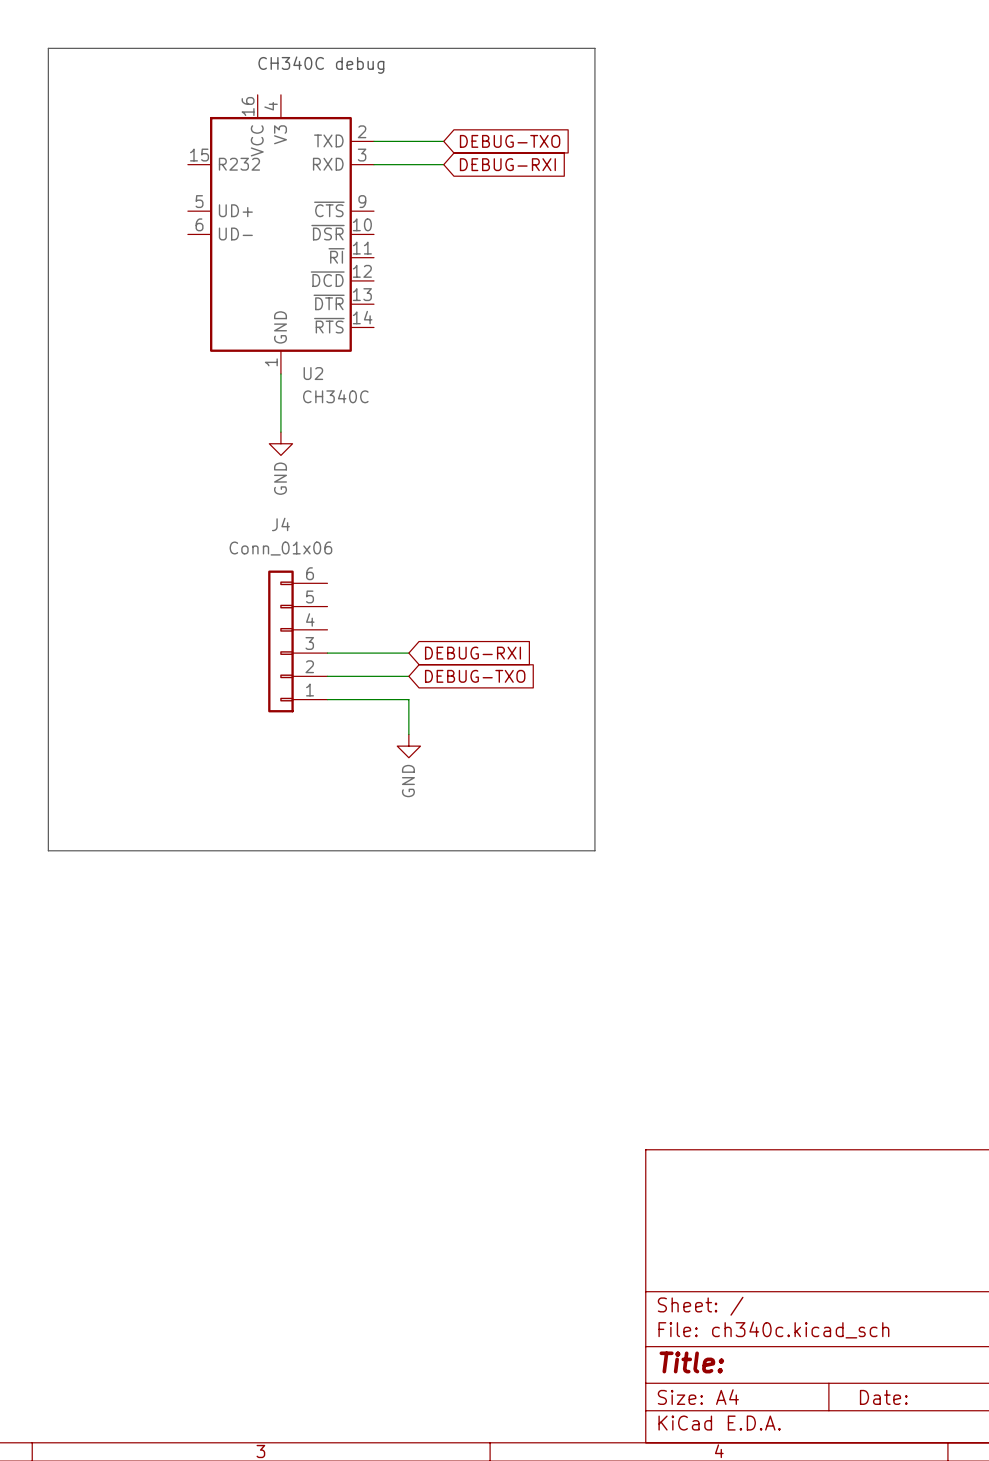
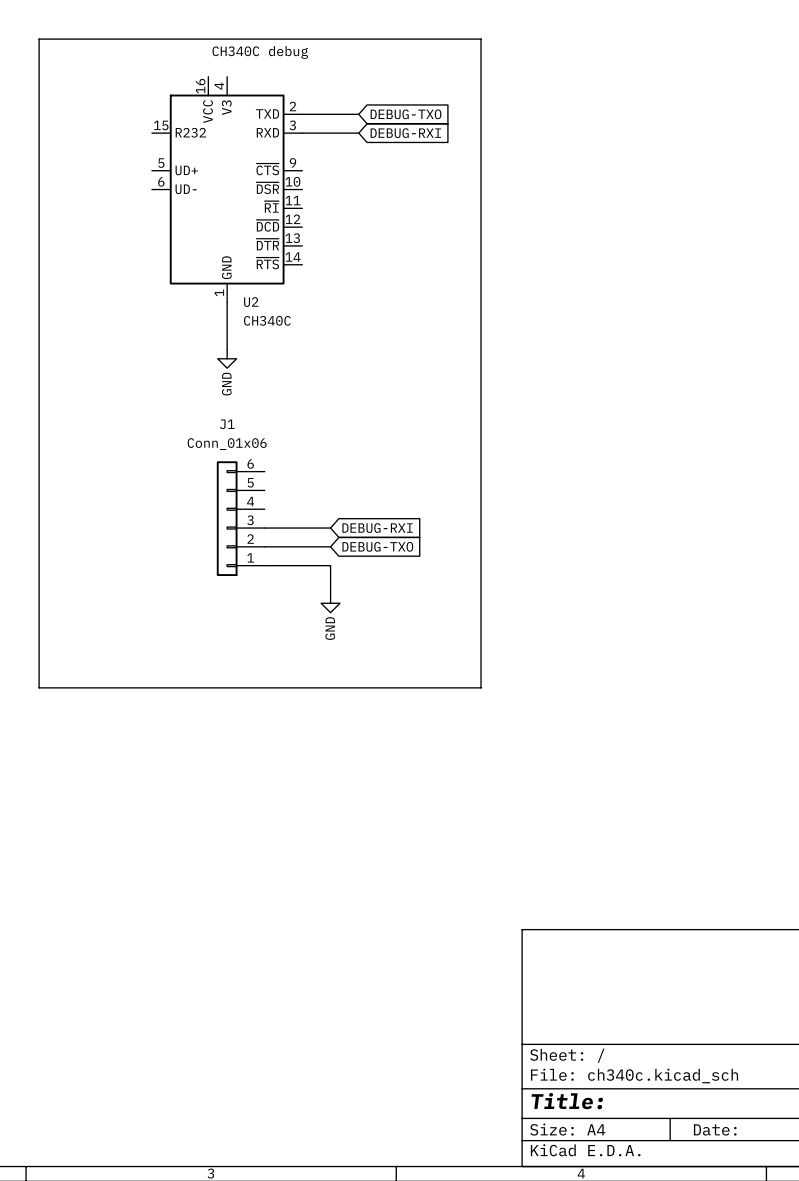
J4 name: J4 (280, 524) -> J1 (227, 424)

